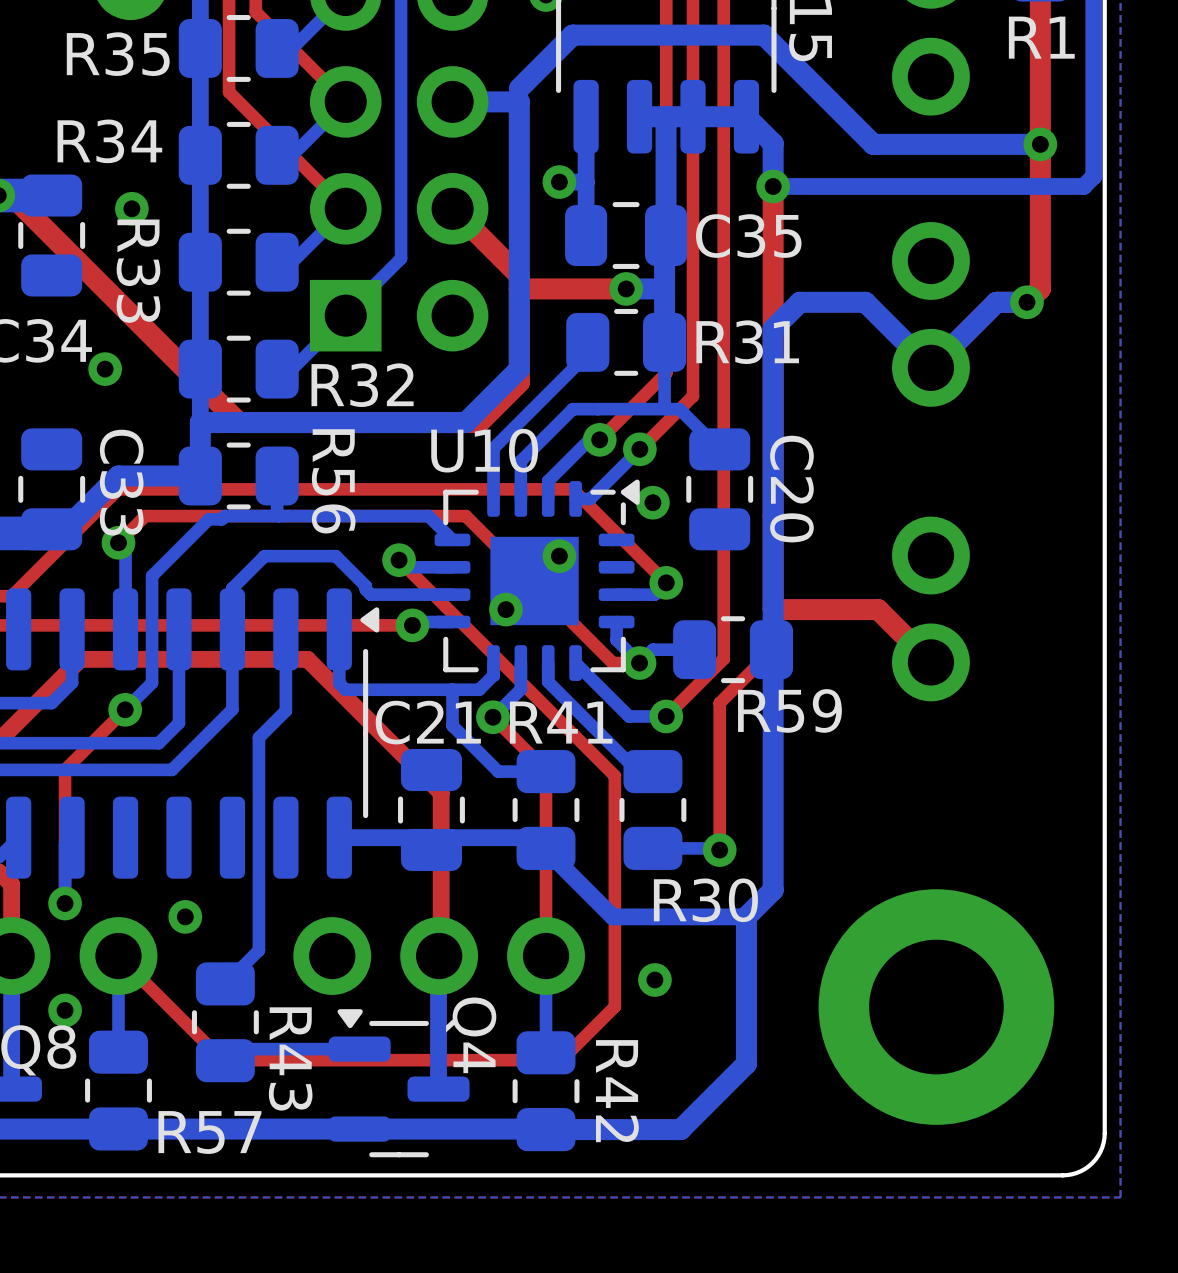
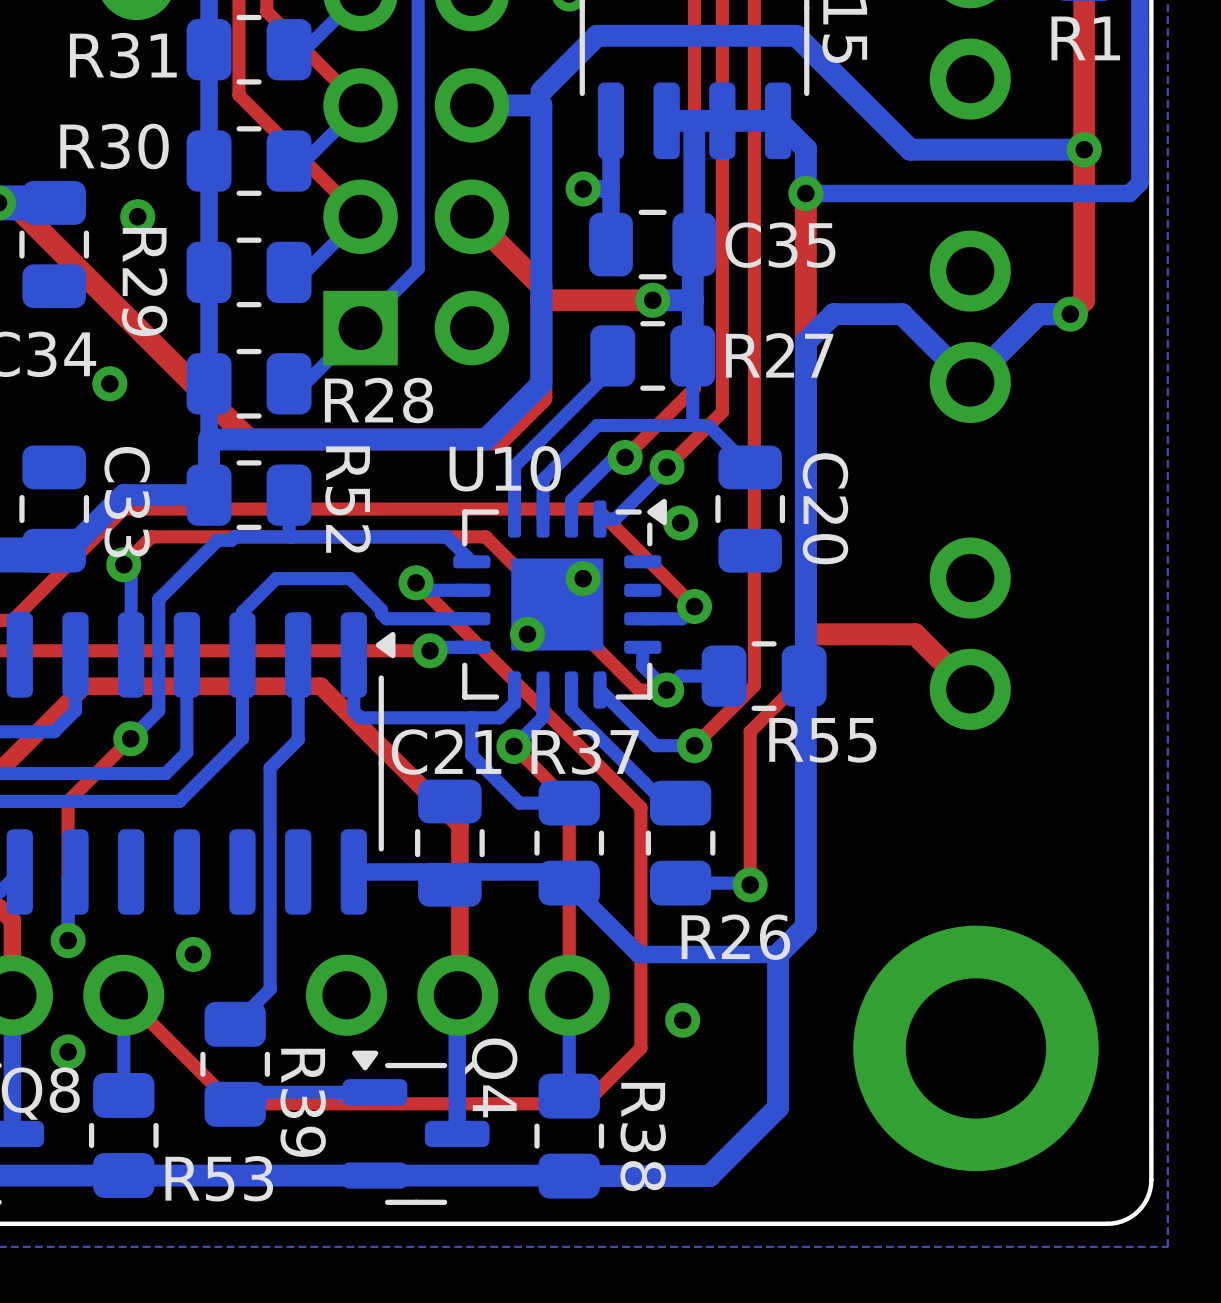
R35 name: R35 (118, 54) -> R31 (123, 55)
R34 name: R34 (109, 141) -> R30 (114, 146)
R33 name: R33 (138, 271) -> R29 (144, 282)
R31 name: R31 (747, 342) -> R27 (779, 355)
R32 name: R32 (362, 385) -> R28 (379, 400)
R56 name: R56 (333, 481) -> R52 (348, 499)
R59 name: R59 (789, 710) -> R55 (822, 740)
R41 name: R41 (561, 722) -> R37 (585, 752)
R30 name: R30 (705, 900) -> R26 (735, 937)
R43 name: R43 (290, 1058) -> R39 (303, 1102)
R42 name: R42 (617, 1091) -> R38 (643, 1137)
R57 name: R57 (209, 1132) -> R53 (219, 1178)

